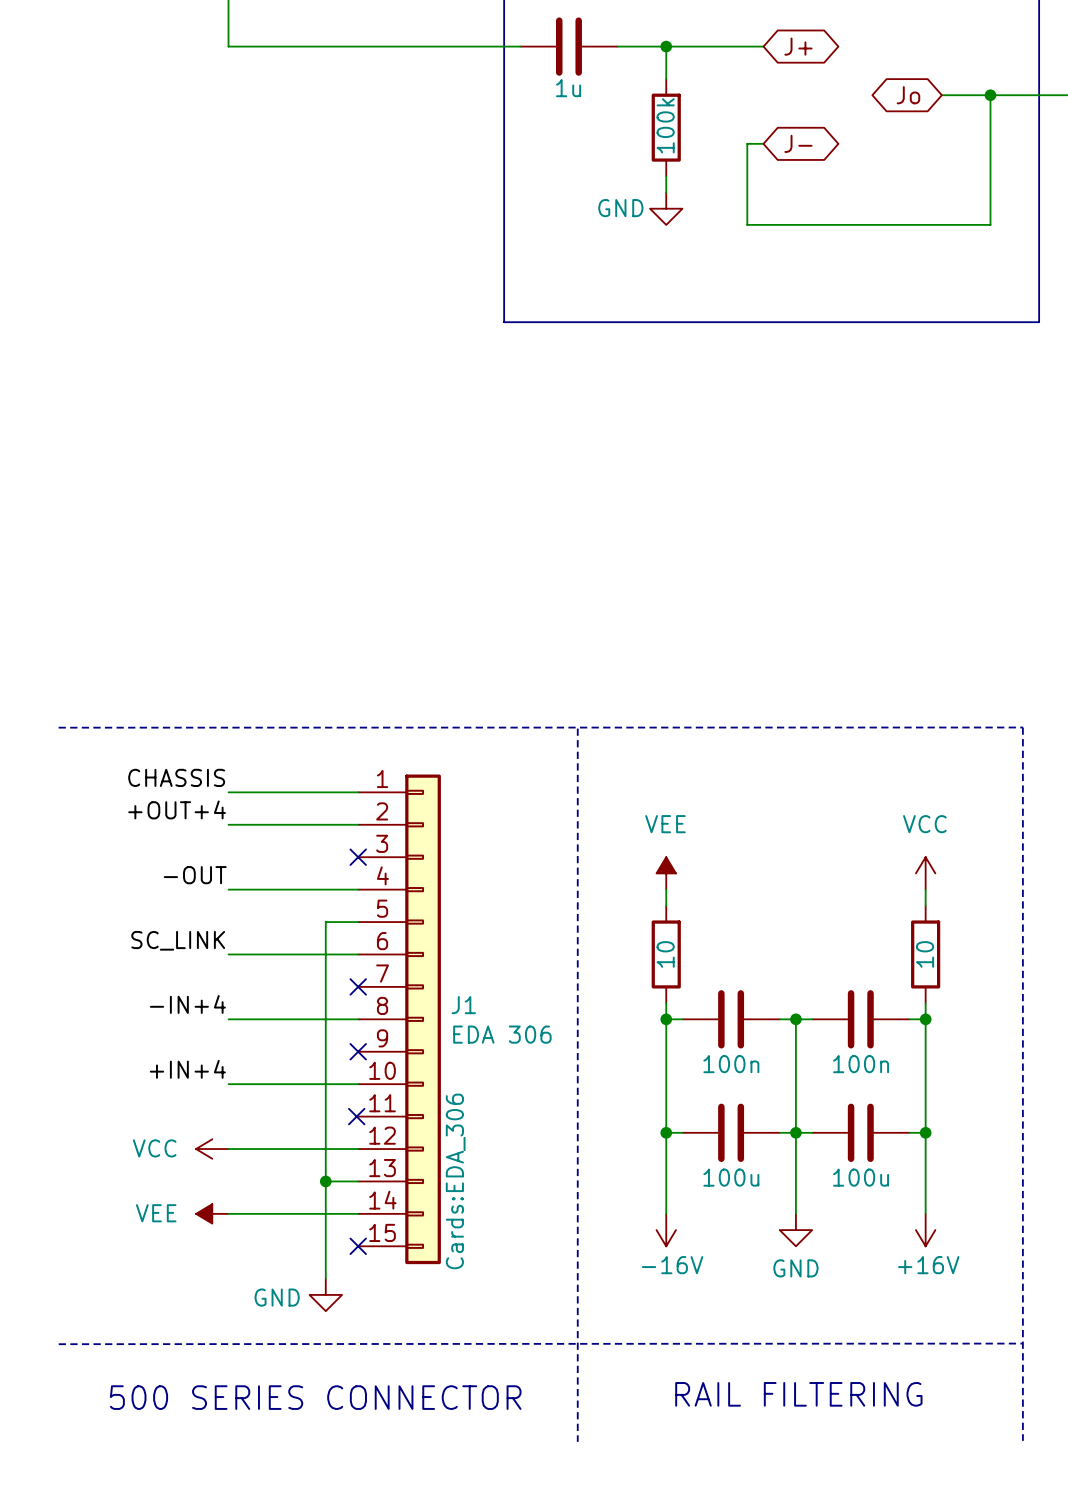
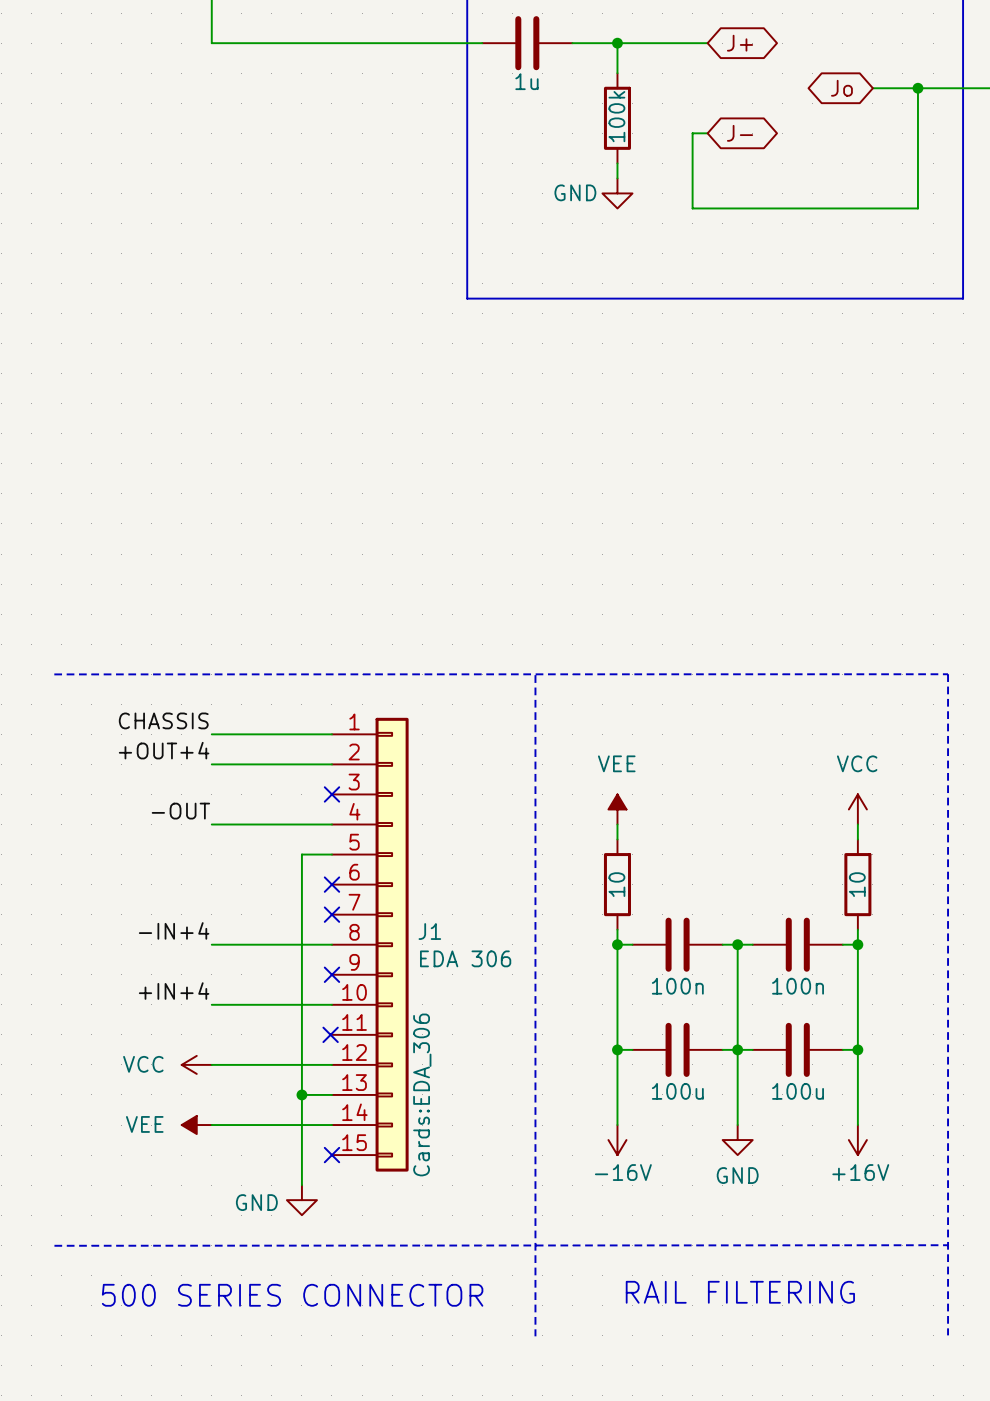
label: SC_LINK (178, 940) -> none
wire: (228, 954) (358, 954) -> none
no-connect mark: none -> (331, 884)

